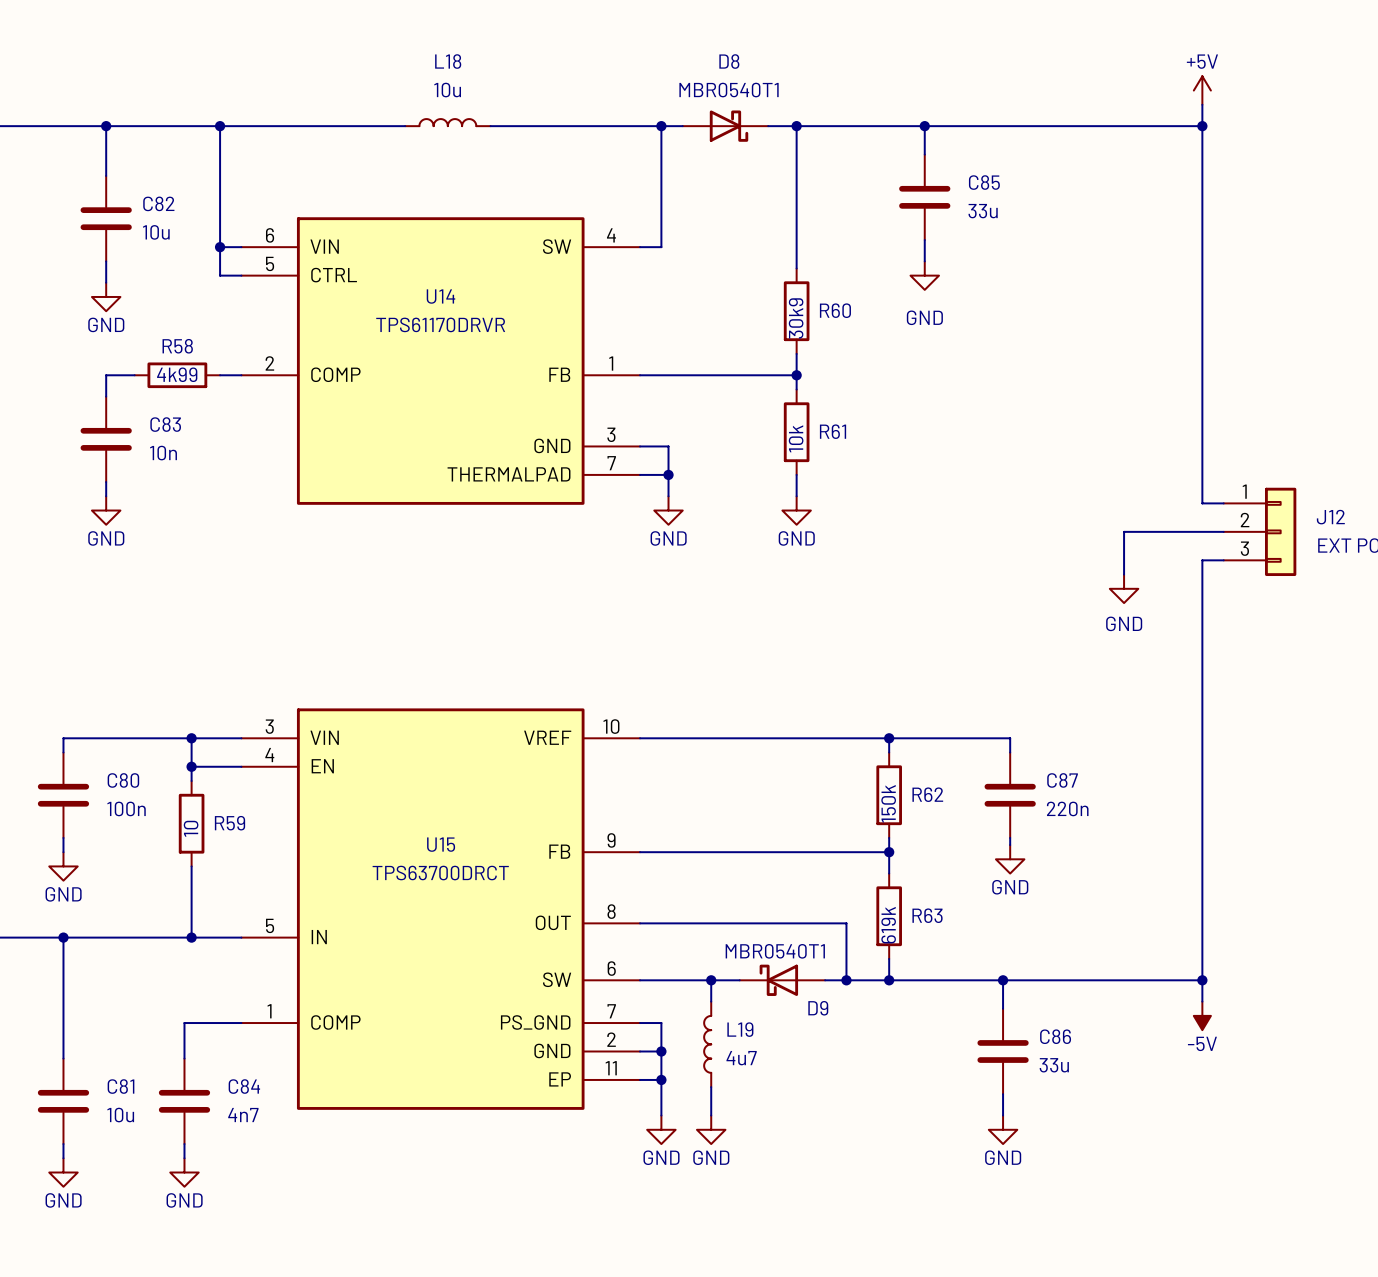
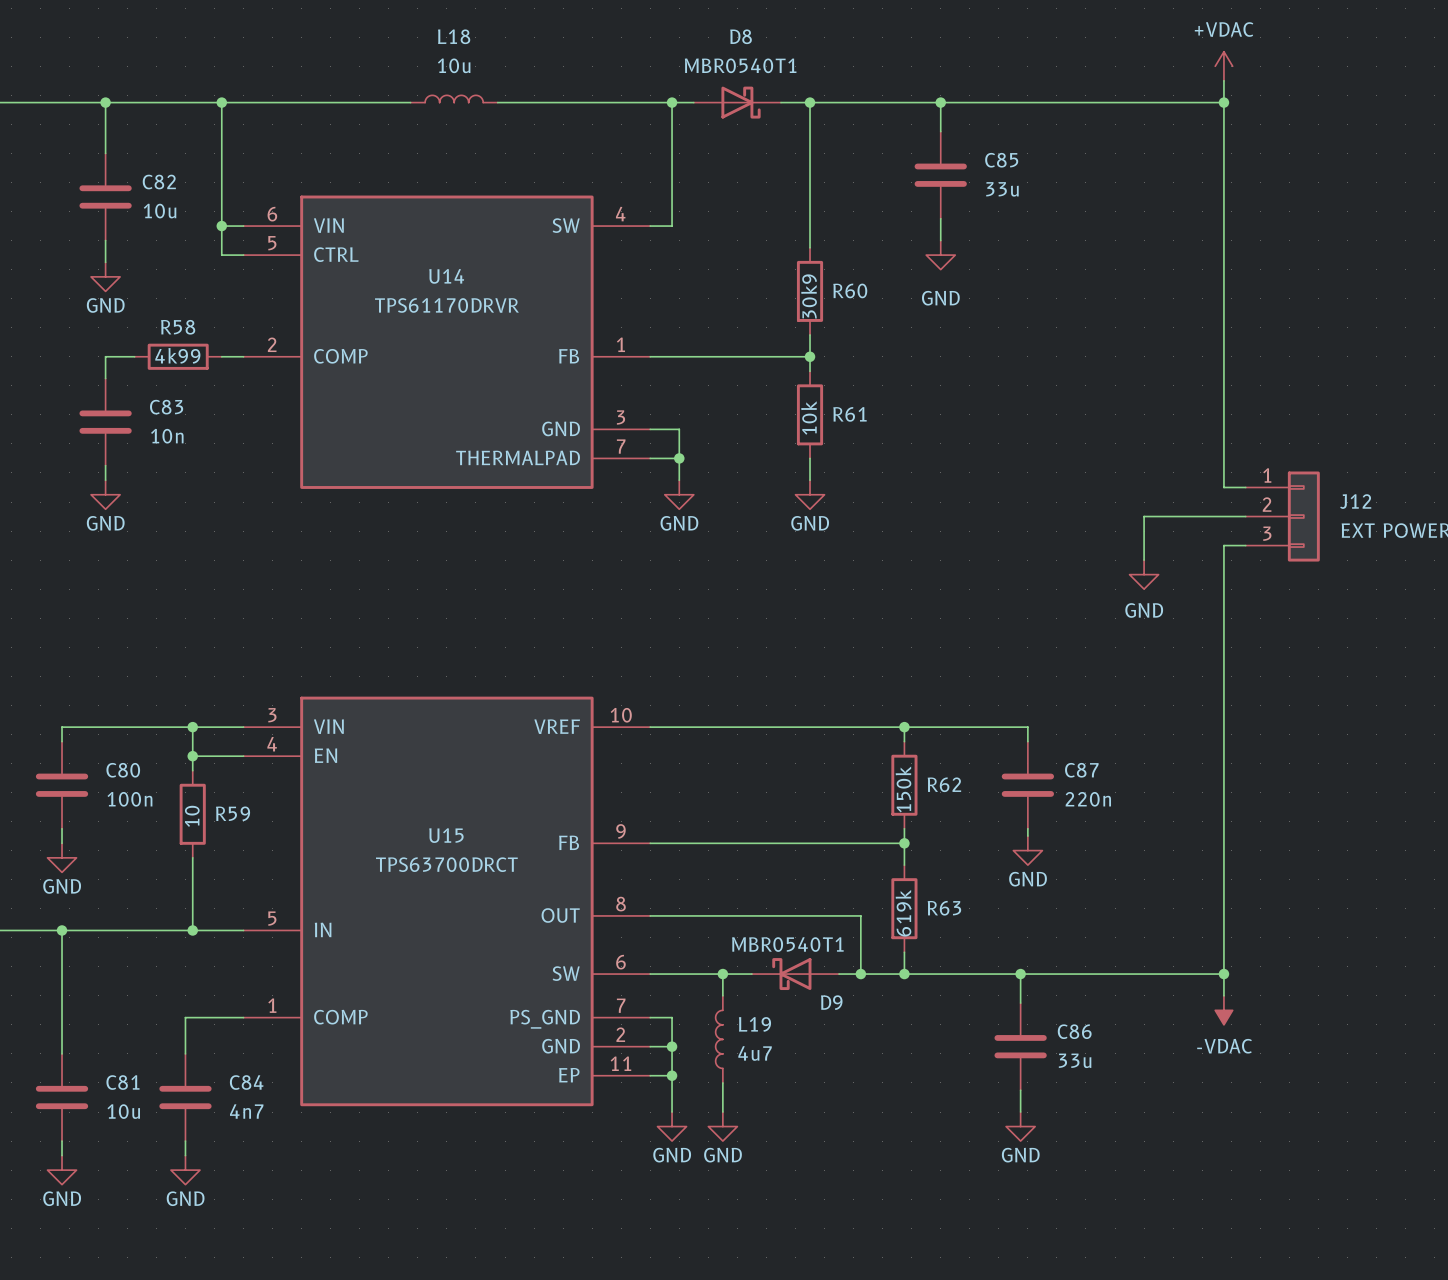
power symbol: +5V (1202, 90) -> +VDAC (1223, 66)
power symbol: -5V (1202, 1015) -> -VDAC (1223, 1010)

